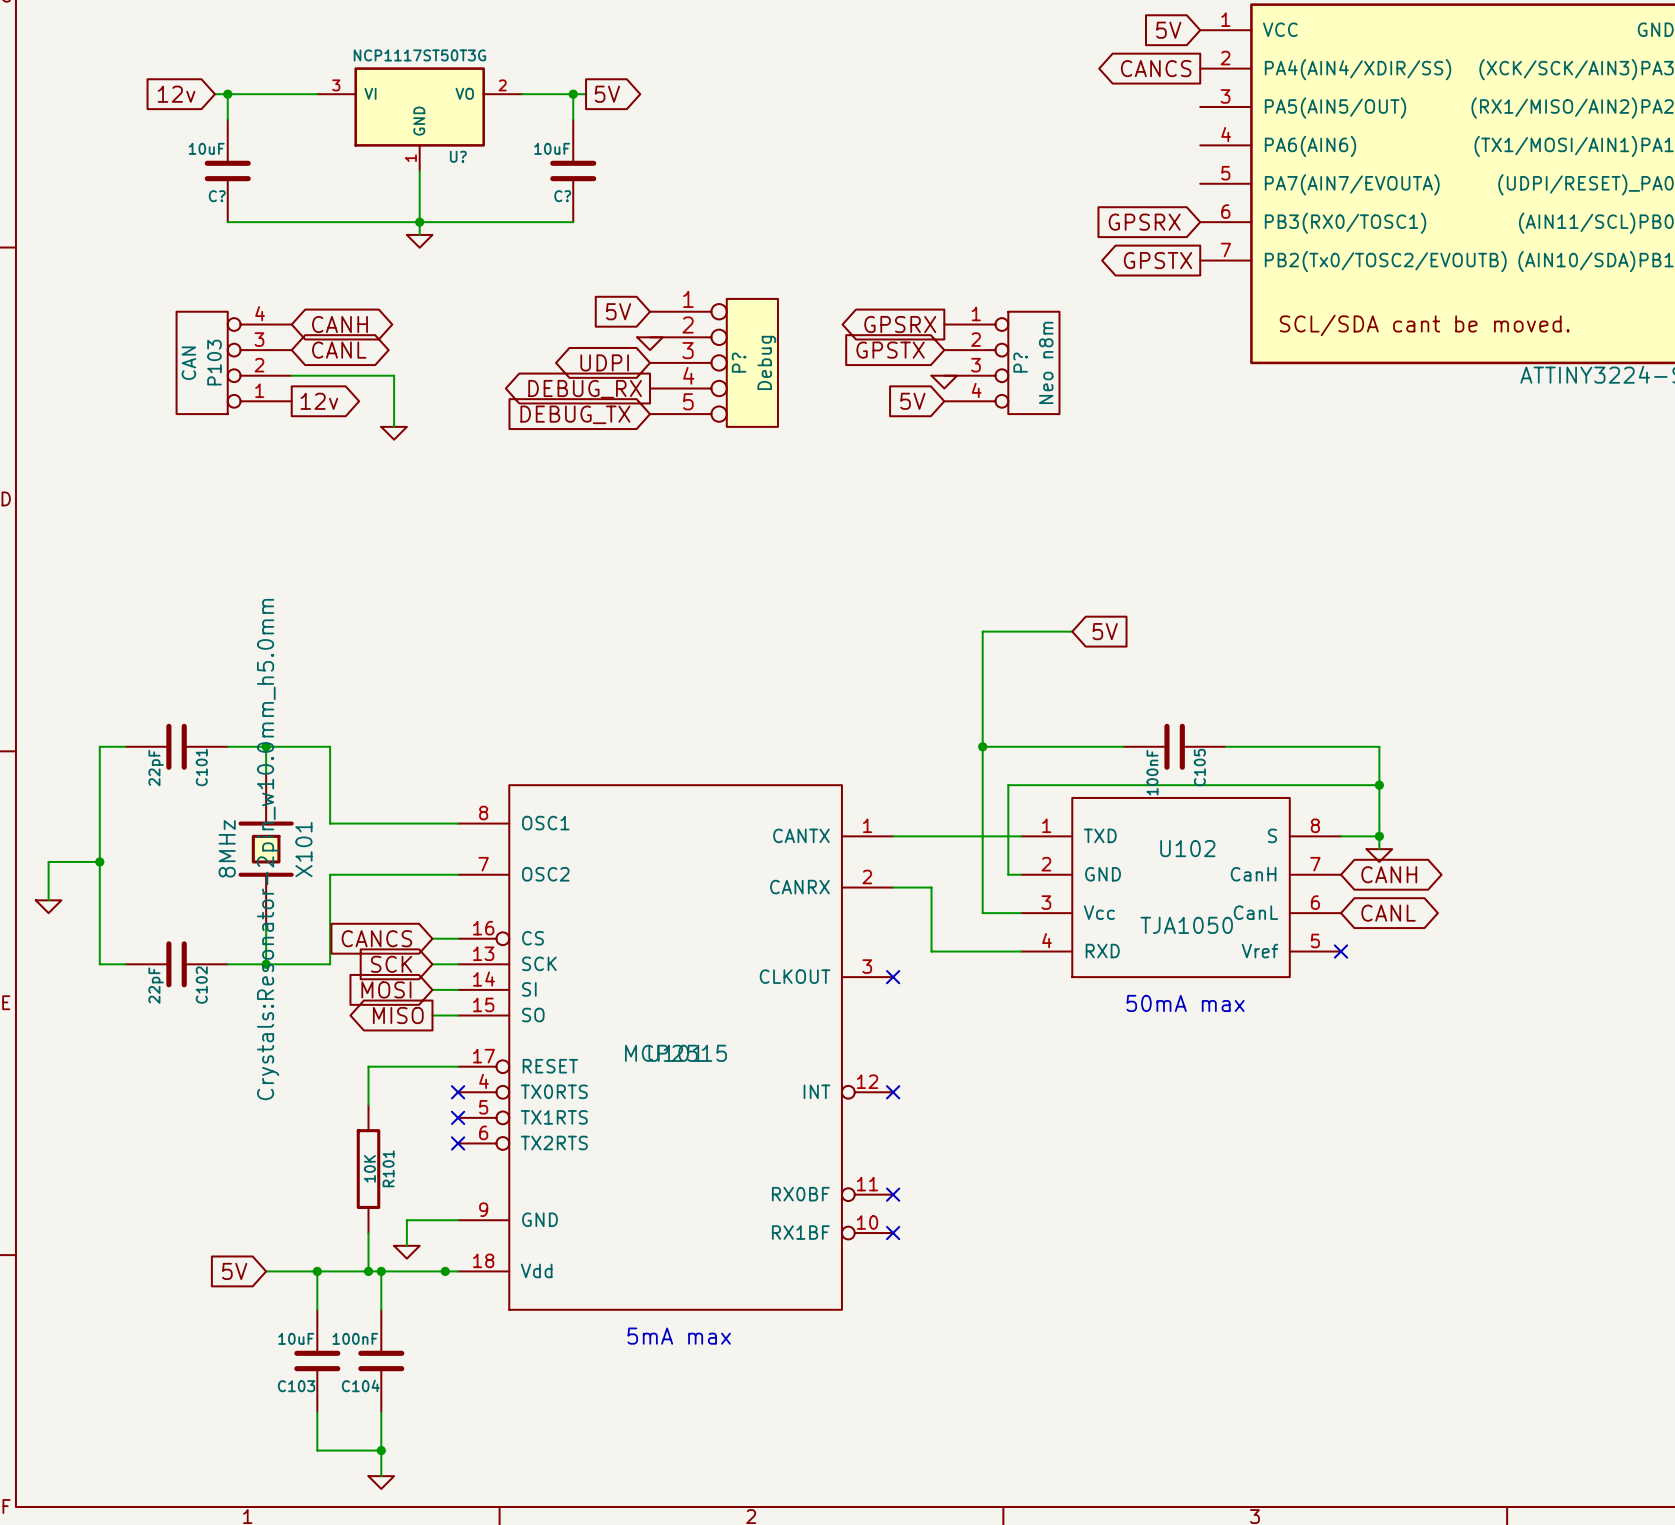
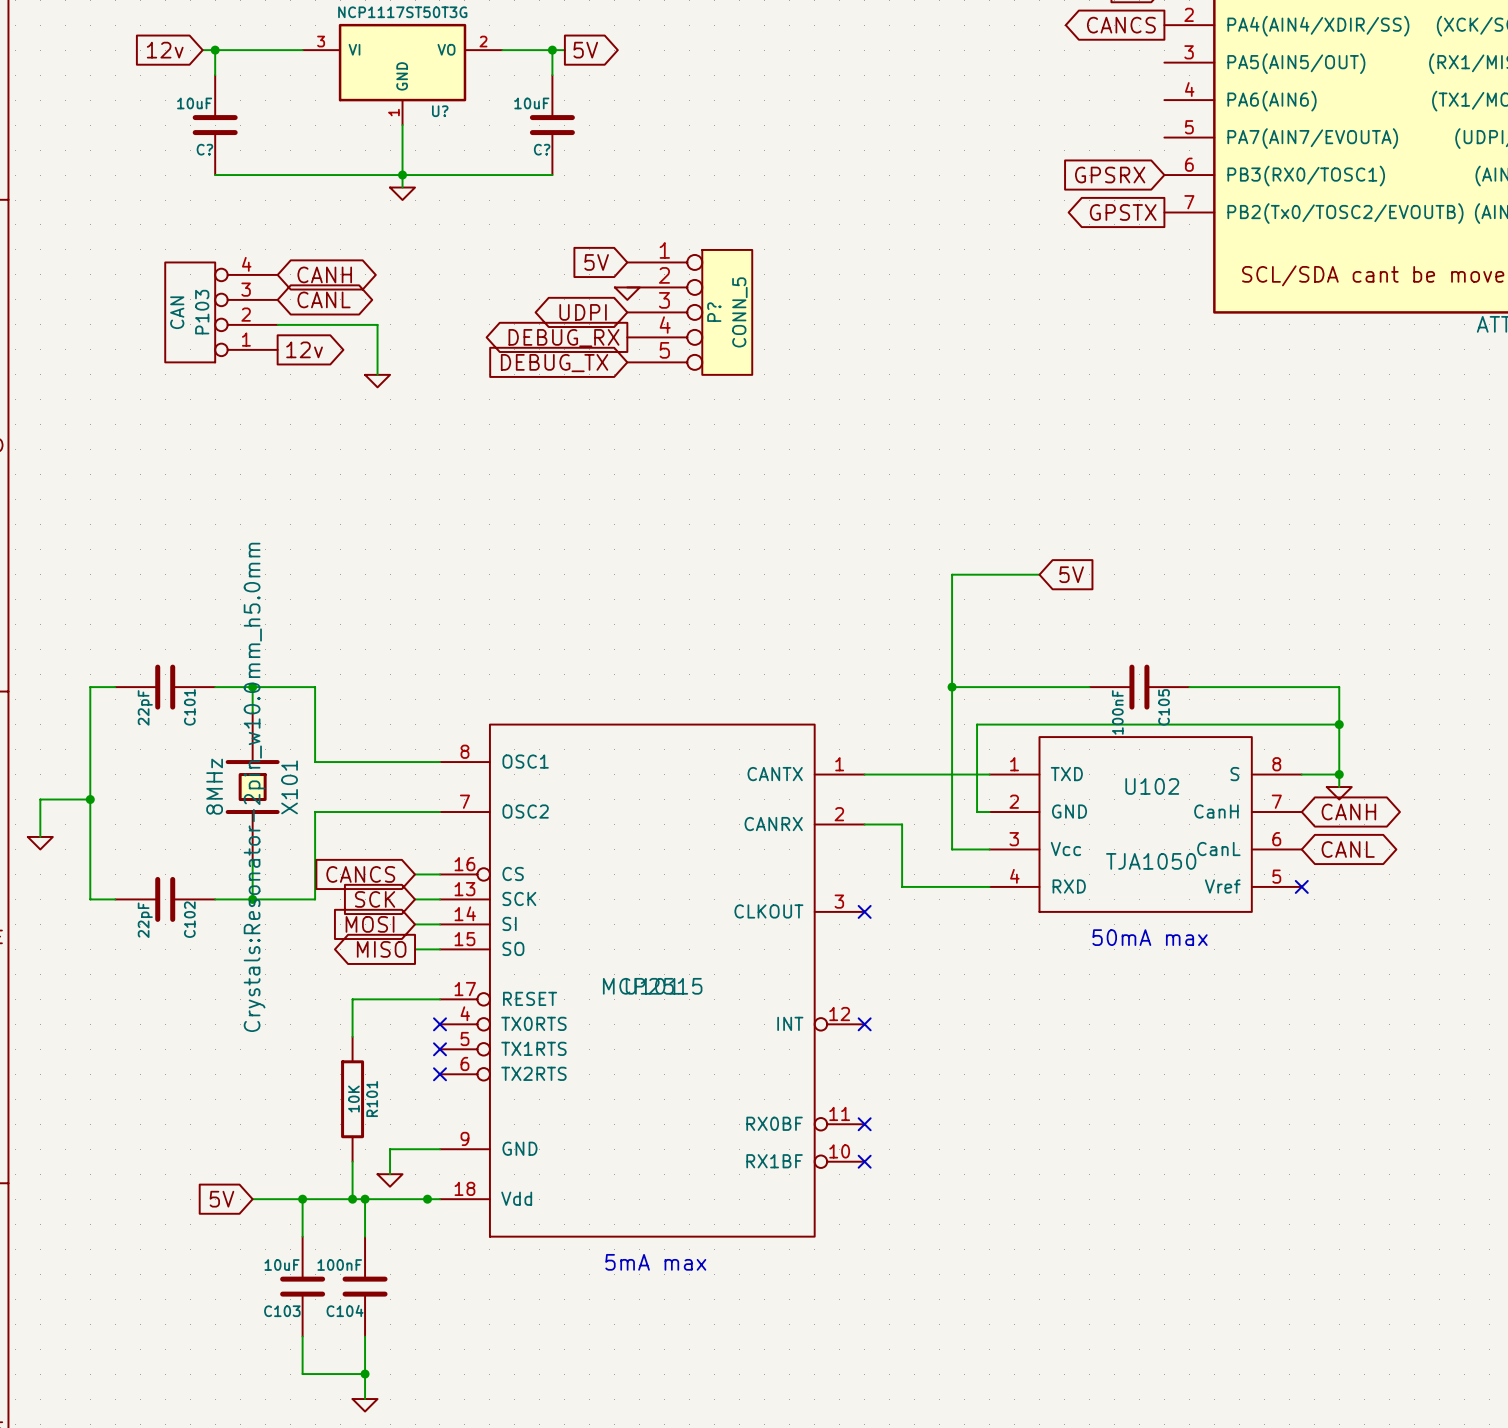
global label: GPSRX (900, 324) -> none
global label: GPSTX (890, 350) -> none
P? value: Debug (766, 362) -> CONN_5 (739, 312)
P?: Neo n8m (1001, 362) -> none
power symbol: (944, 382) -> none
global label: 5V (912, 401) -> none

